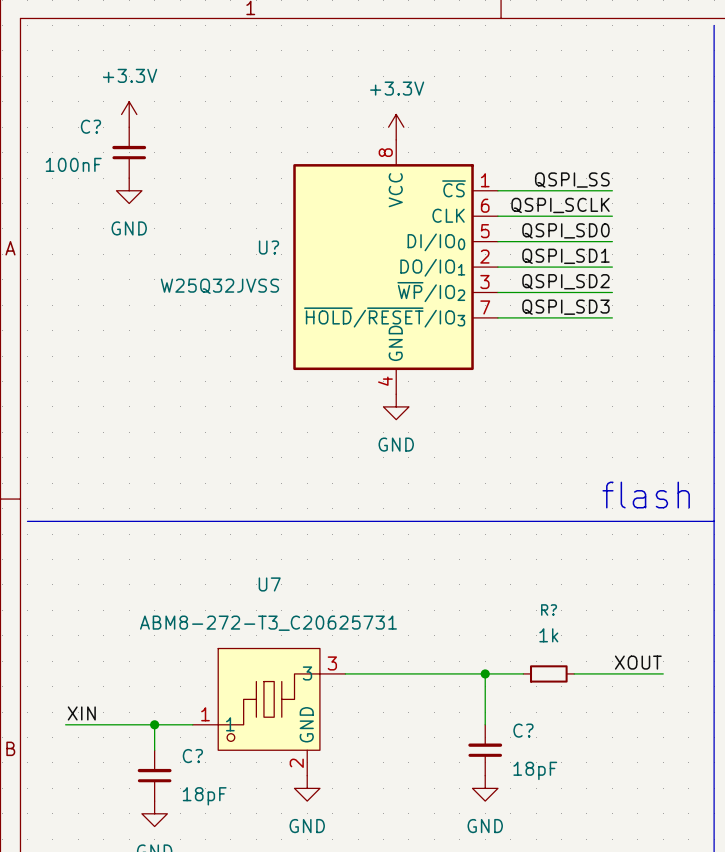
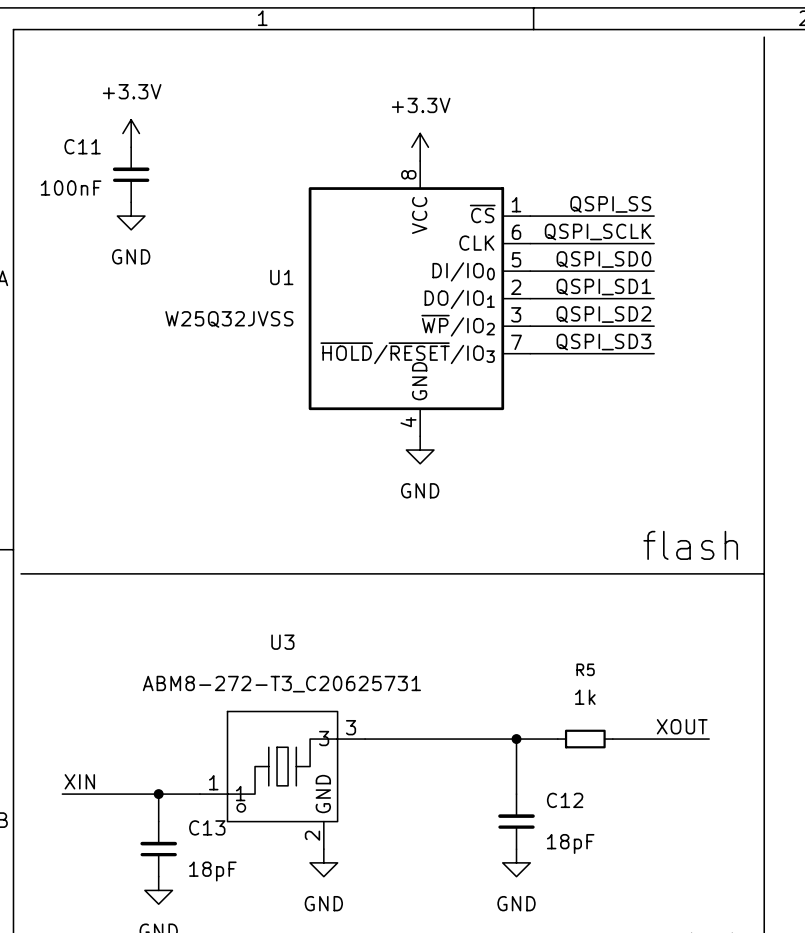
C? name: C? (90, 126) -> C11 (82, 146)
U? name: U? (268, 247) -> U1 (281, 277)
U7 name: U7 (269, 584) -> U3 (282, 642)
R? name: R? (549, 609) -> R5 (585, 669)
C? name: C? (523, 730) -> C12 (565, 800)
C? name: C? (192, 756) -> C13 (207, 827)

